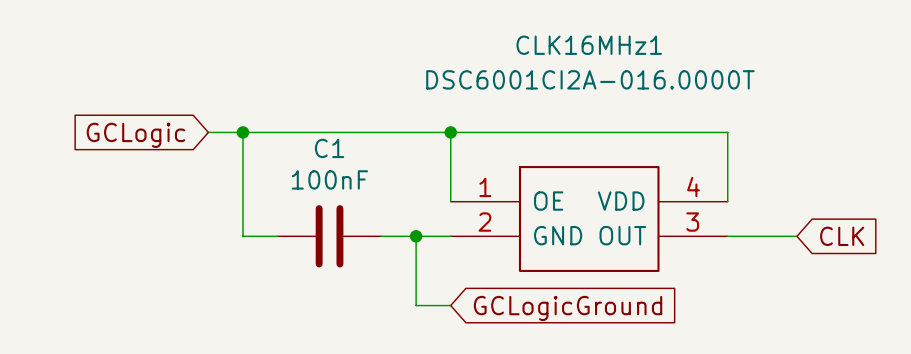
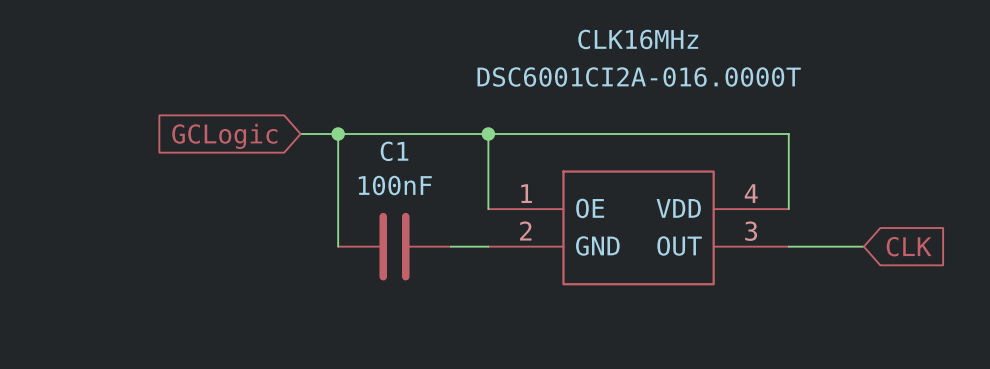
CLK16MHz1 name: CLK16MHz1 (589, 45) -> CLK16MHz (638, 39)
wire: (208, 132) (277, 132) -> none
wire: (242, 132) (242, 236) (277, 236) -> none
junction position: (242, 132) -> (338, 134)
wire: none -> (338, 134) (338, 246)
global label position: GCLogic (135, 135) -> GCLogic (224, 136)
C1 position: (329, 236) -> (394, 246)
wire: (381, 236) (416, 236) (416, 305) (450, 305) -> none
junction: (416, 236) -> none
global label: GCLogicGround (568, 308) -> none

